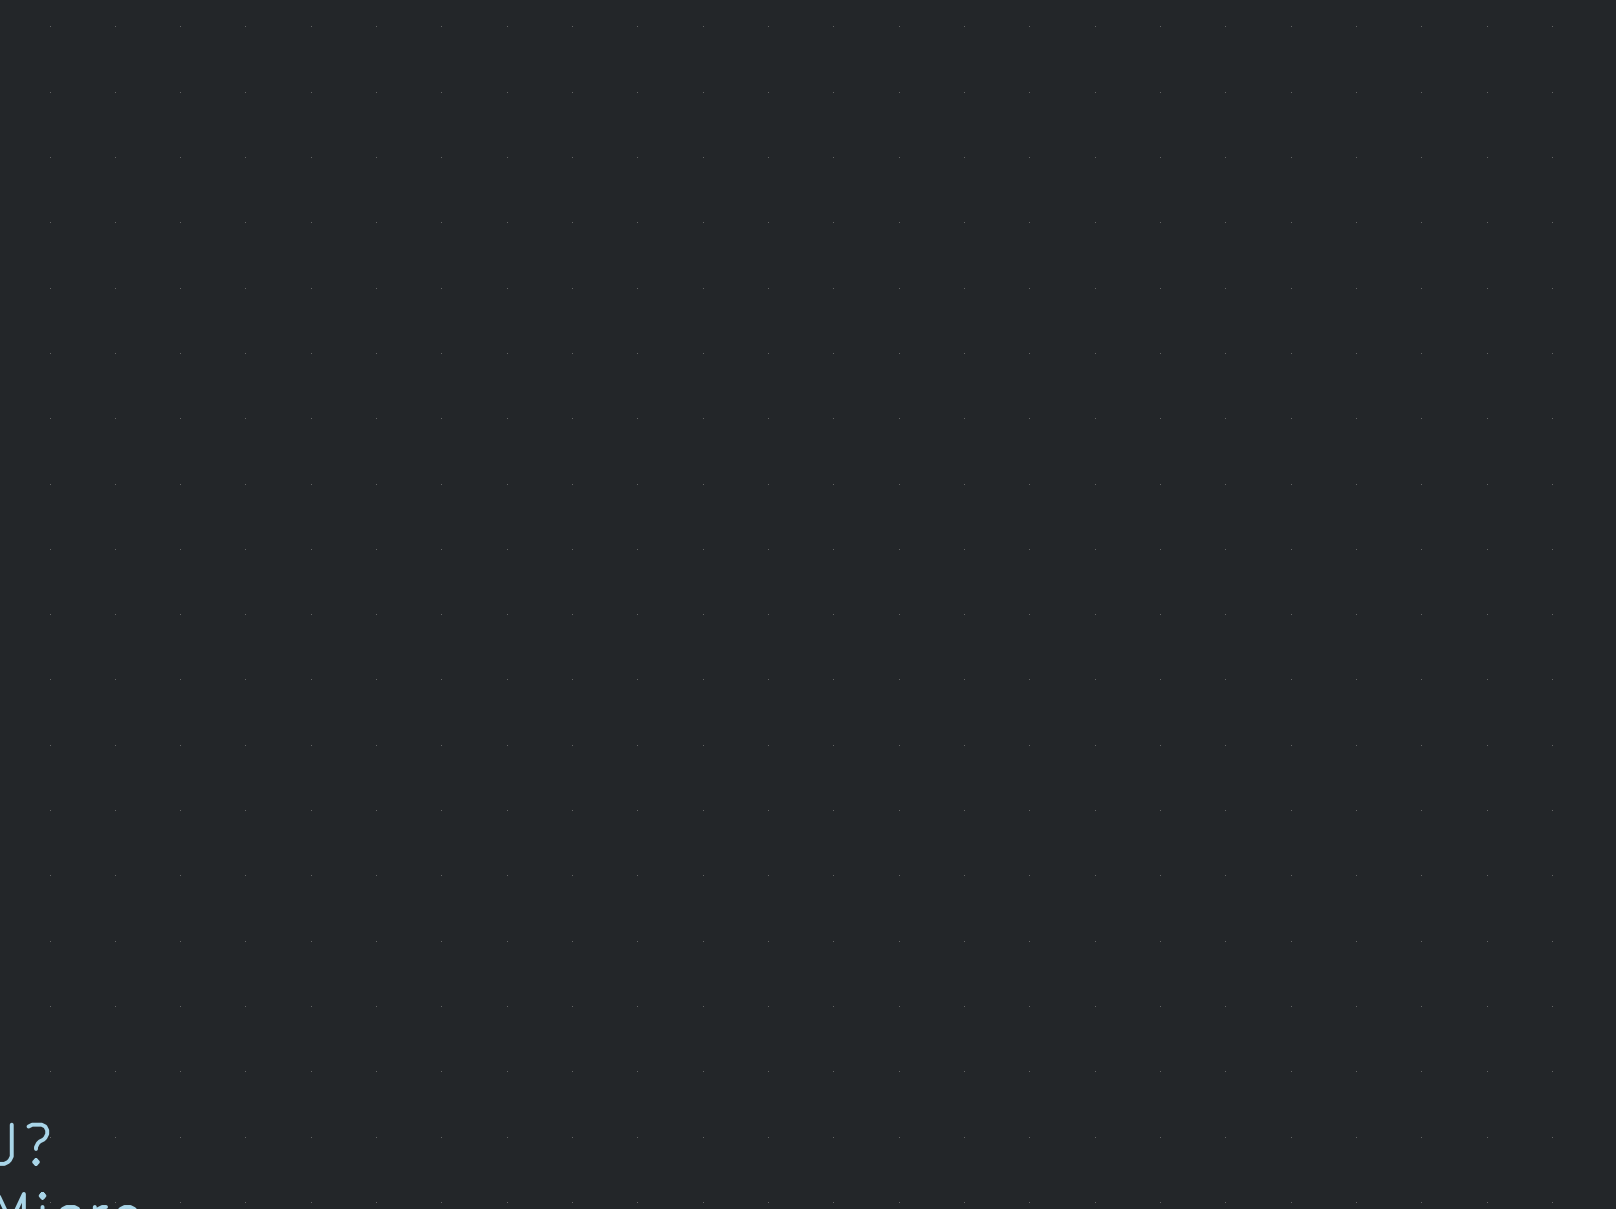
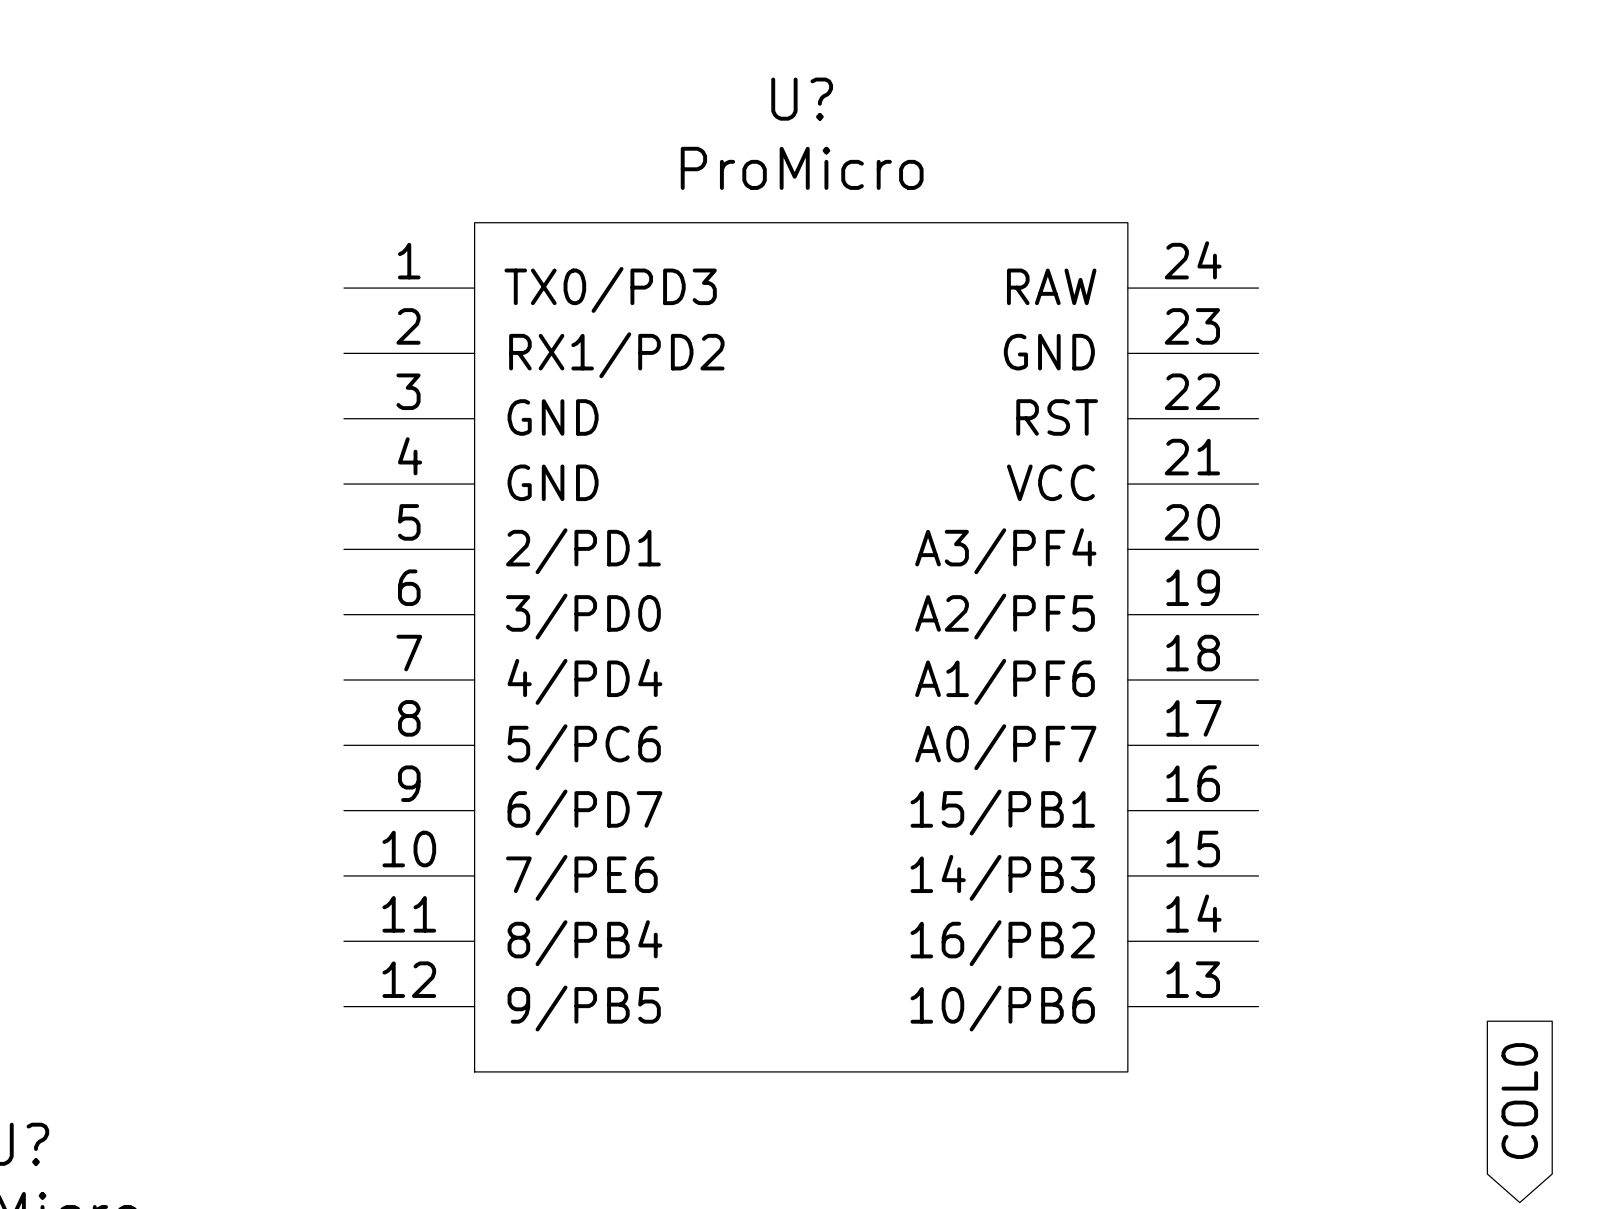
U?: none -> ProMicro (801, 647)
global label: none -> COL0 (1519, 1101)

